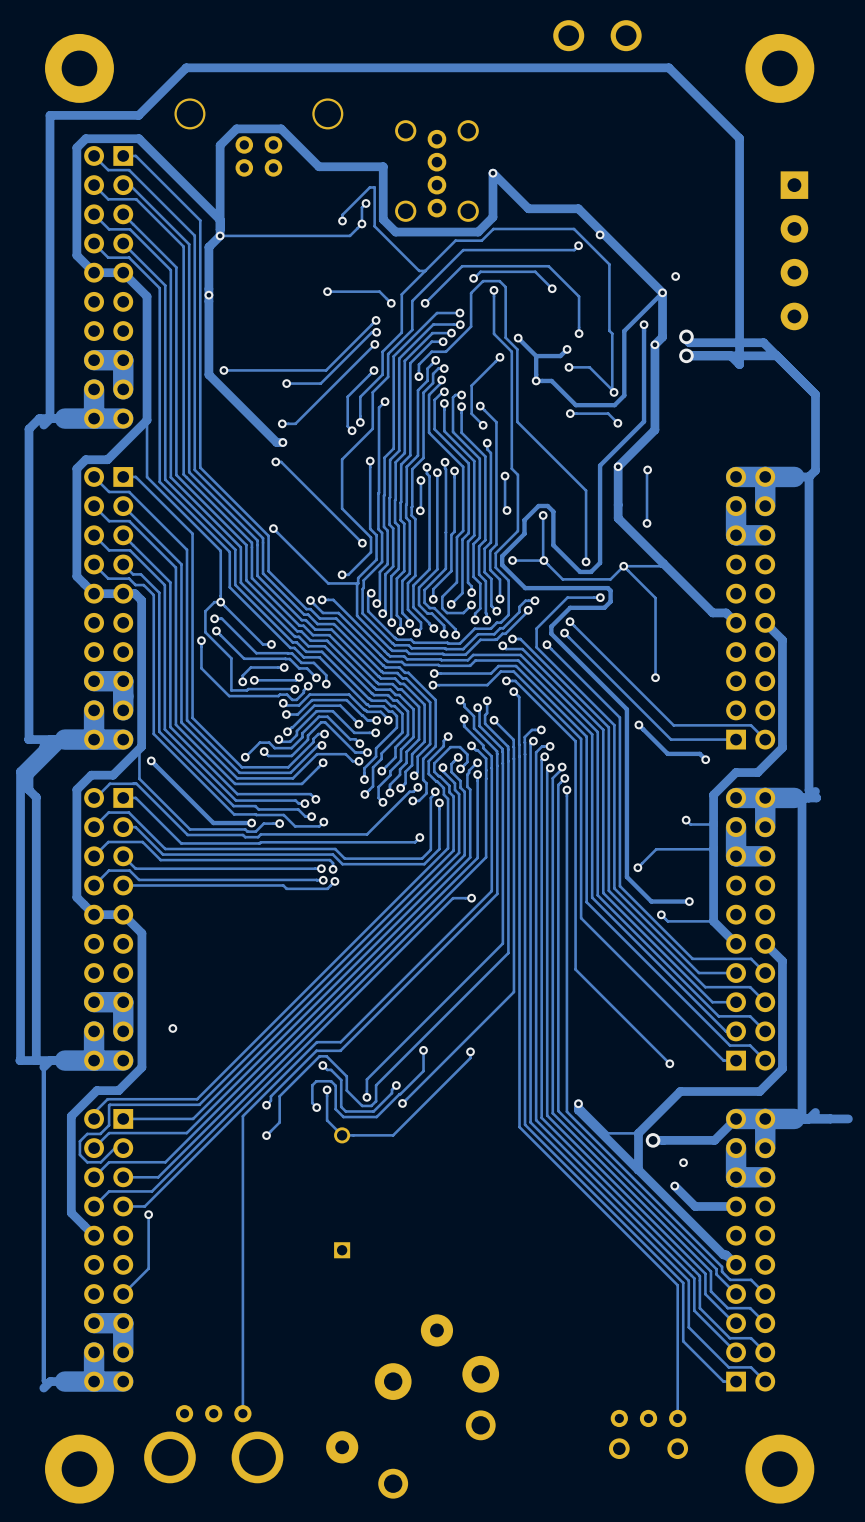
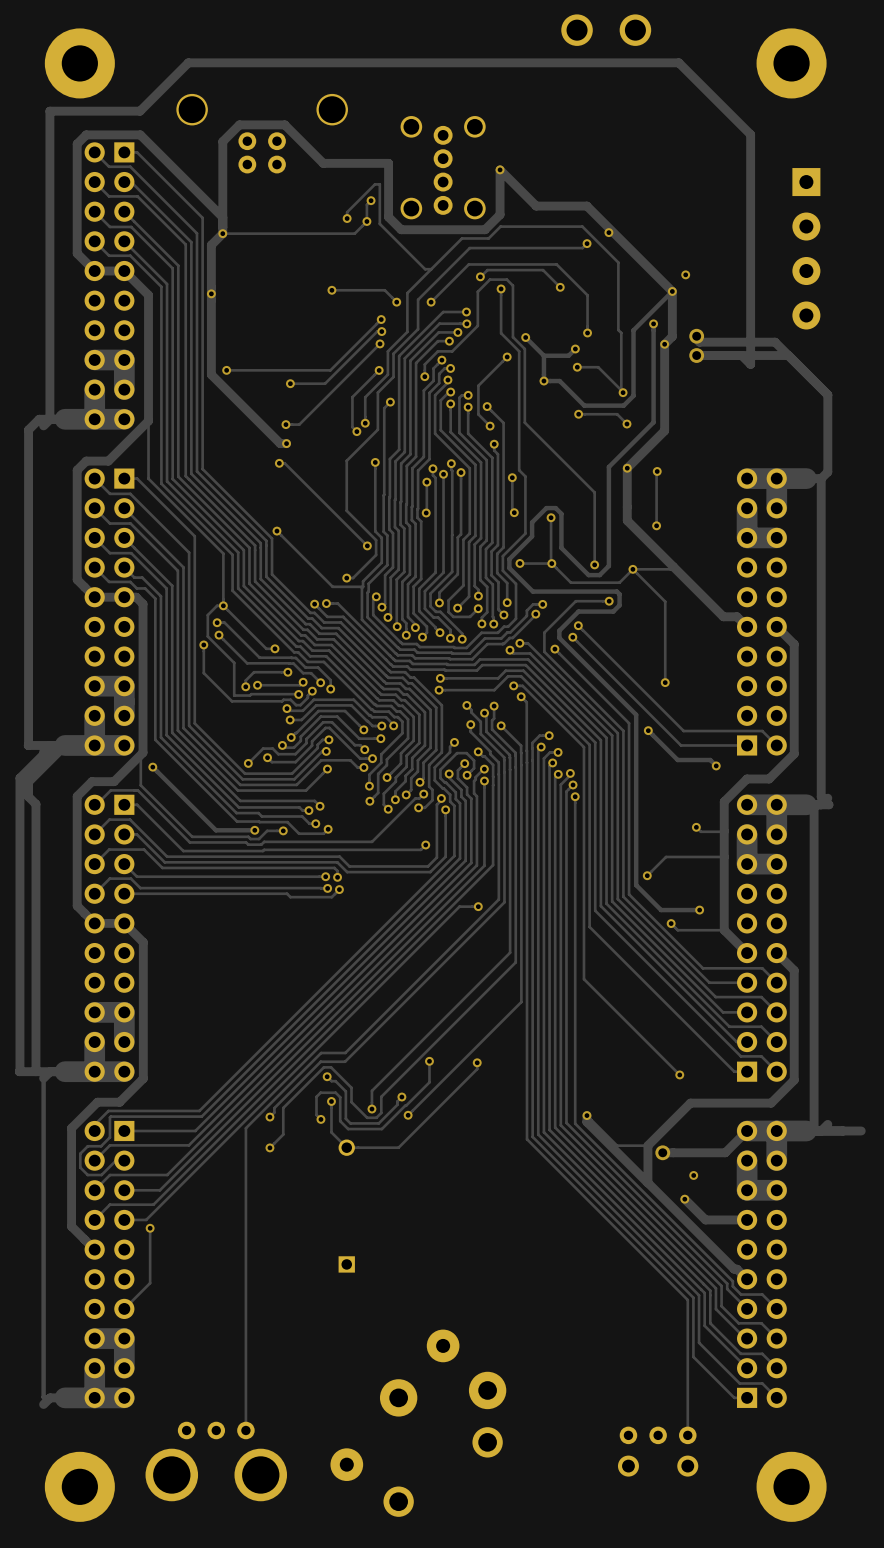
via: (172, 1028) -> none

